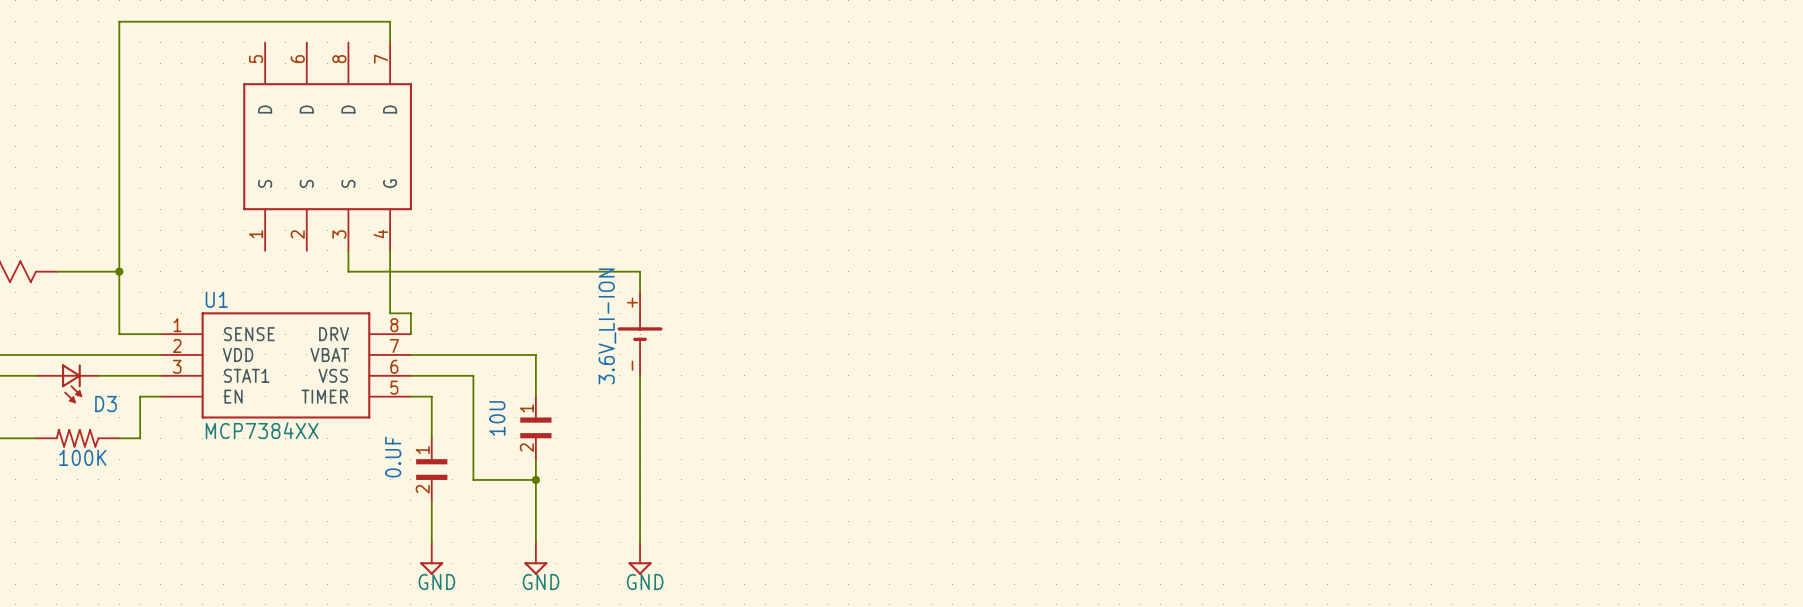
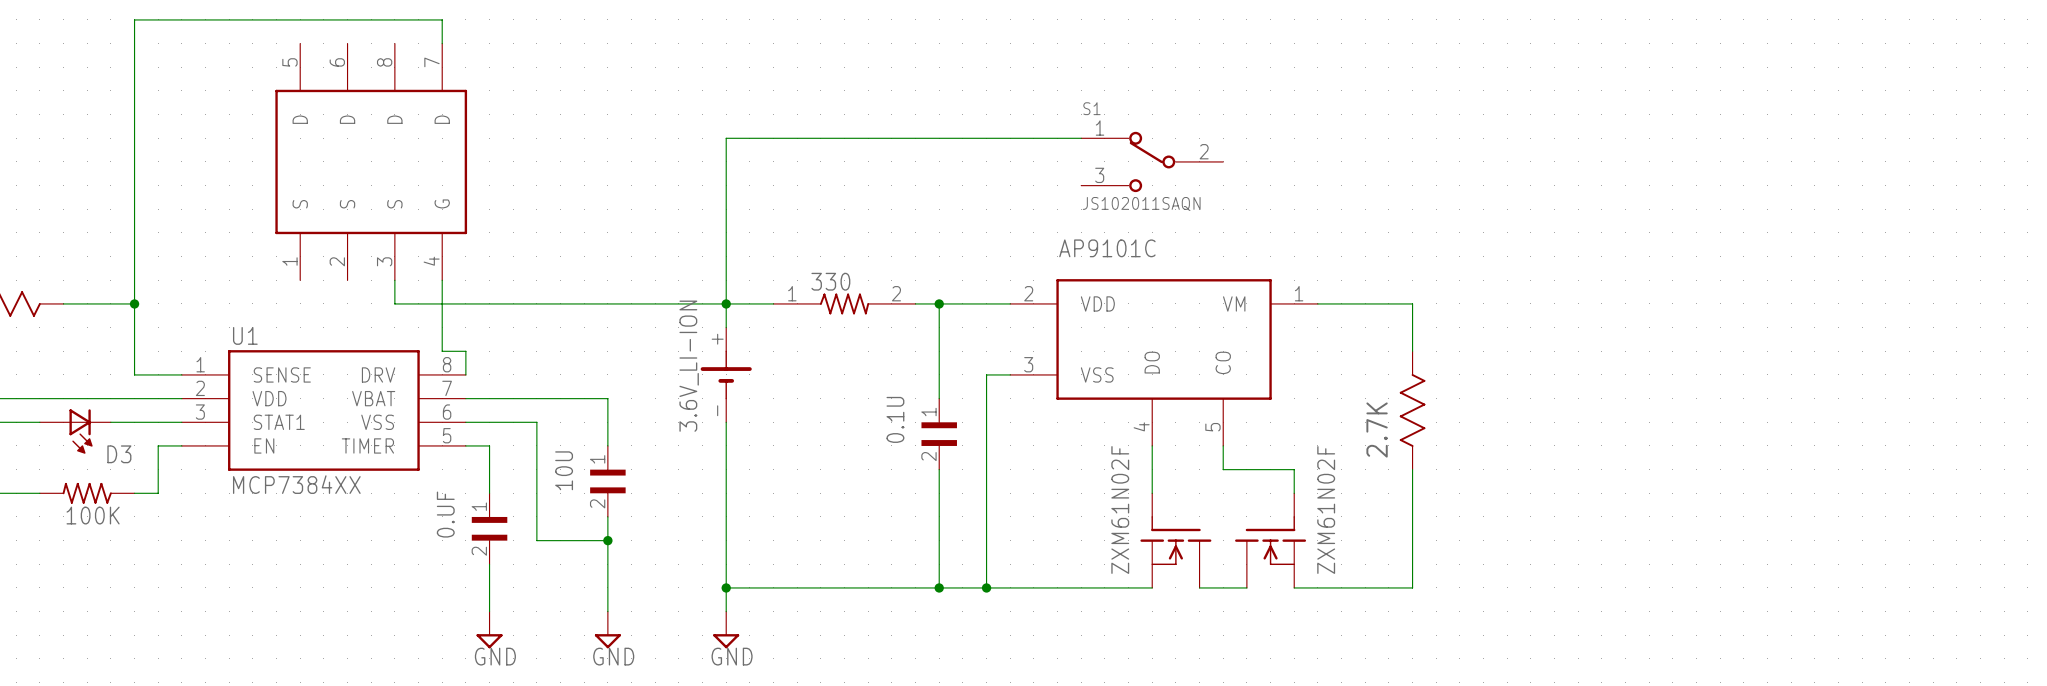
wire: none -> (1081, 138) (726, 138) (726, 303) (773, 303)
S1: none -> JS102011SAQN (1152, 161)
junction: none -> (726, 303)
330: none -> (844, 303)
wire: none -> (915, 303) (1010, 303)
wire: none -> (939, 303) (939, 398)
junction: none -> (939, 303)
wire: none -> (1317, 303) (1412, 303) (1412, 351)
part: none -> (1164, 362)
wire: none -> (1010, 374) (986, 374) (986, 587)
2.7K: none -> (1412, 410)
0.1U: none -> (939, 434)
wire: none -> (1152, 445) (1152, 493)
wire: none -> (1223, 445) (1223, 469) (1294, 469) (1294, 493)
wire: none -> (939, 469) (939, 587)
wire: none -> (1412, 469) (1412, 587) (1294, 587)
part: none -> ZXM61N02F (1175, 540)
part: none -> ZXM61N02F (1270, 540)
wire: none -> (726, 587) (1152, 587)
junction: none -> (726, 587)
junction: none -> (939, 587)
junction: none -> (986, 587)
wire: none -> (1199, 587) (1246, 587)

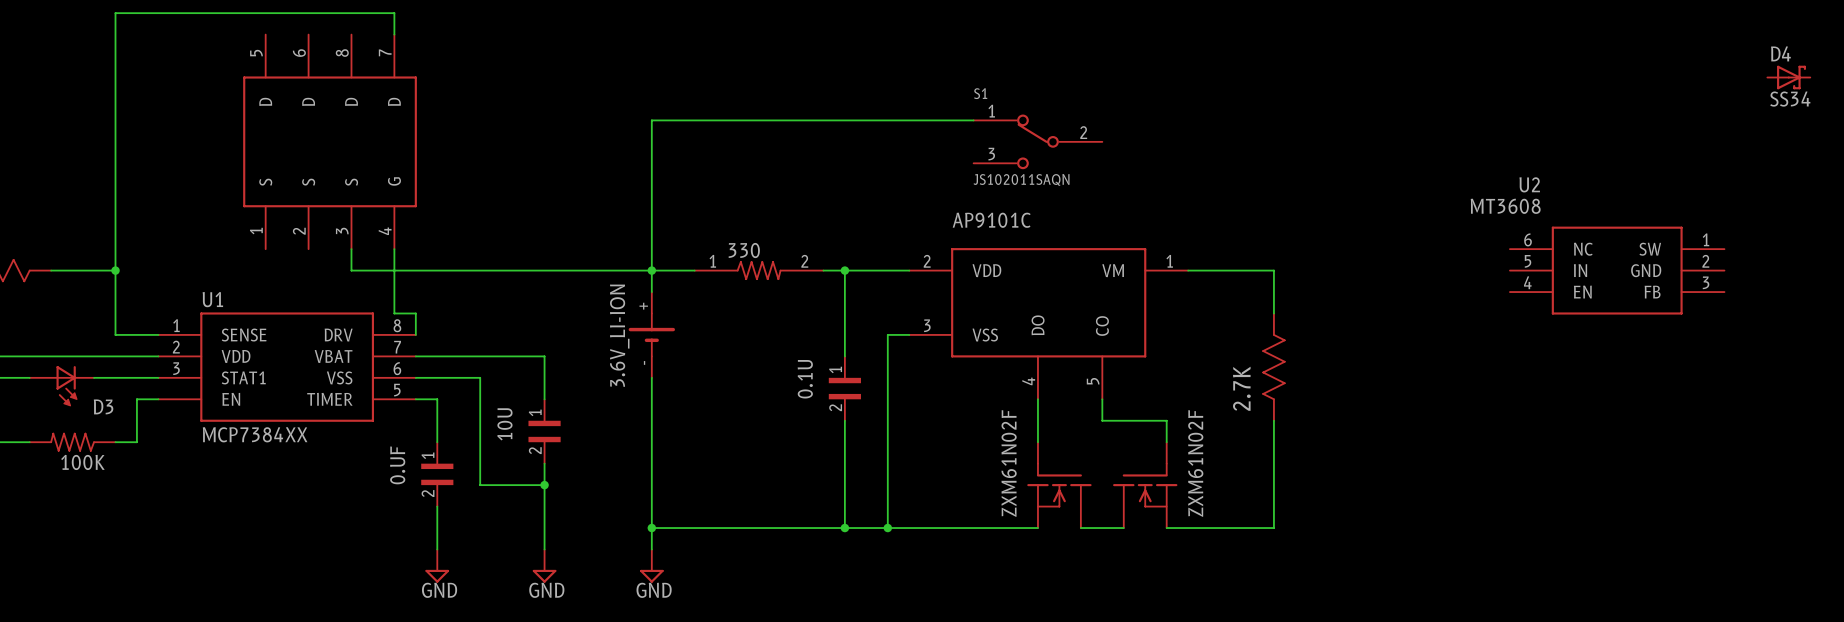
D4: none -> SS34 (1788, 77)
U2: none -> MT3608 (1617, 270)

